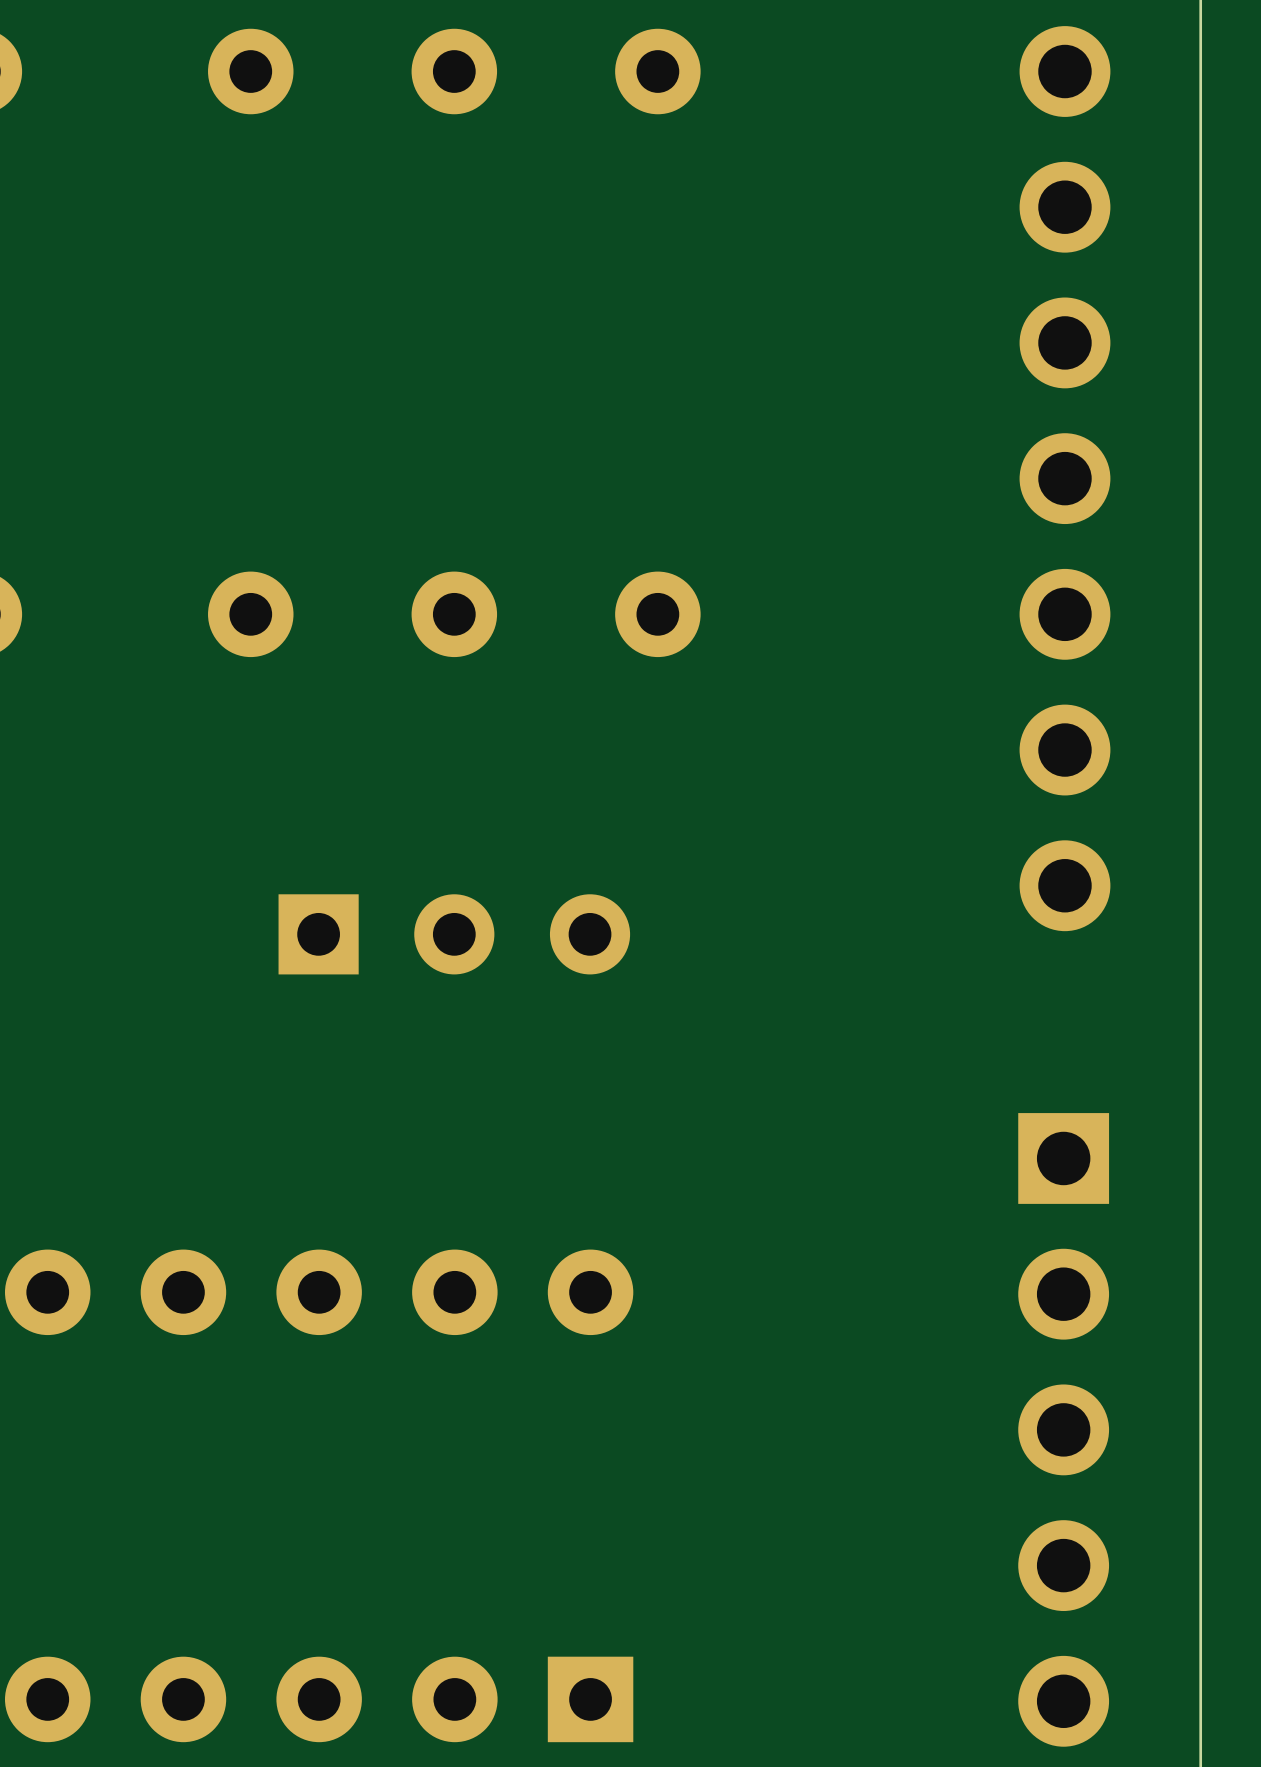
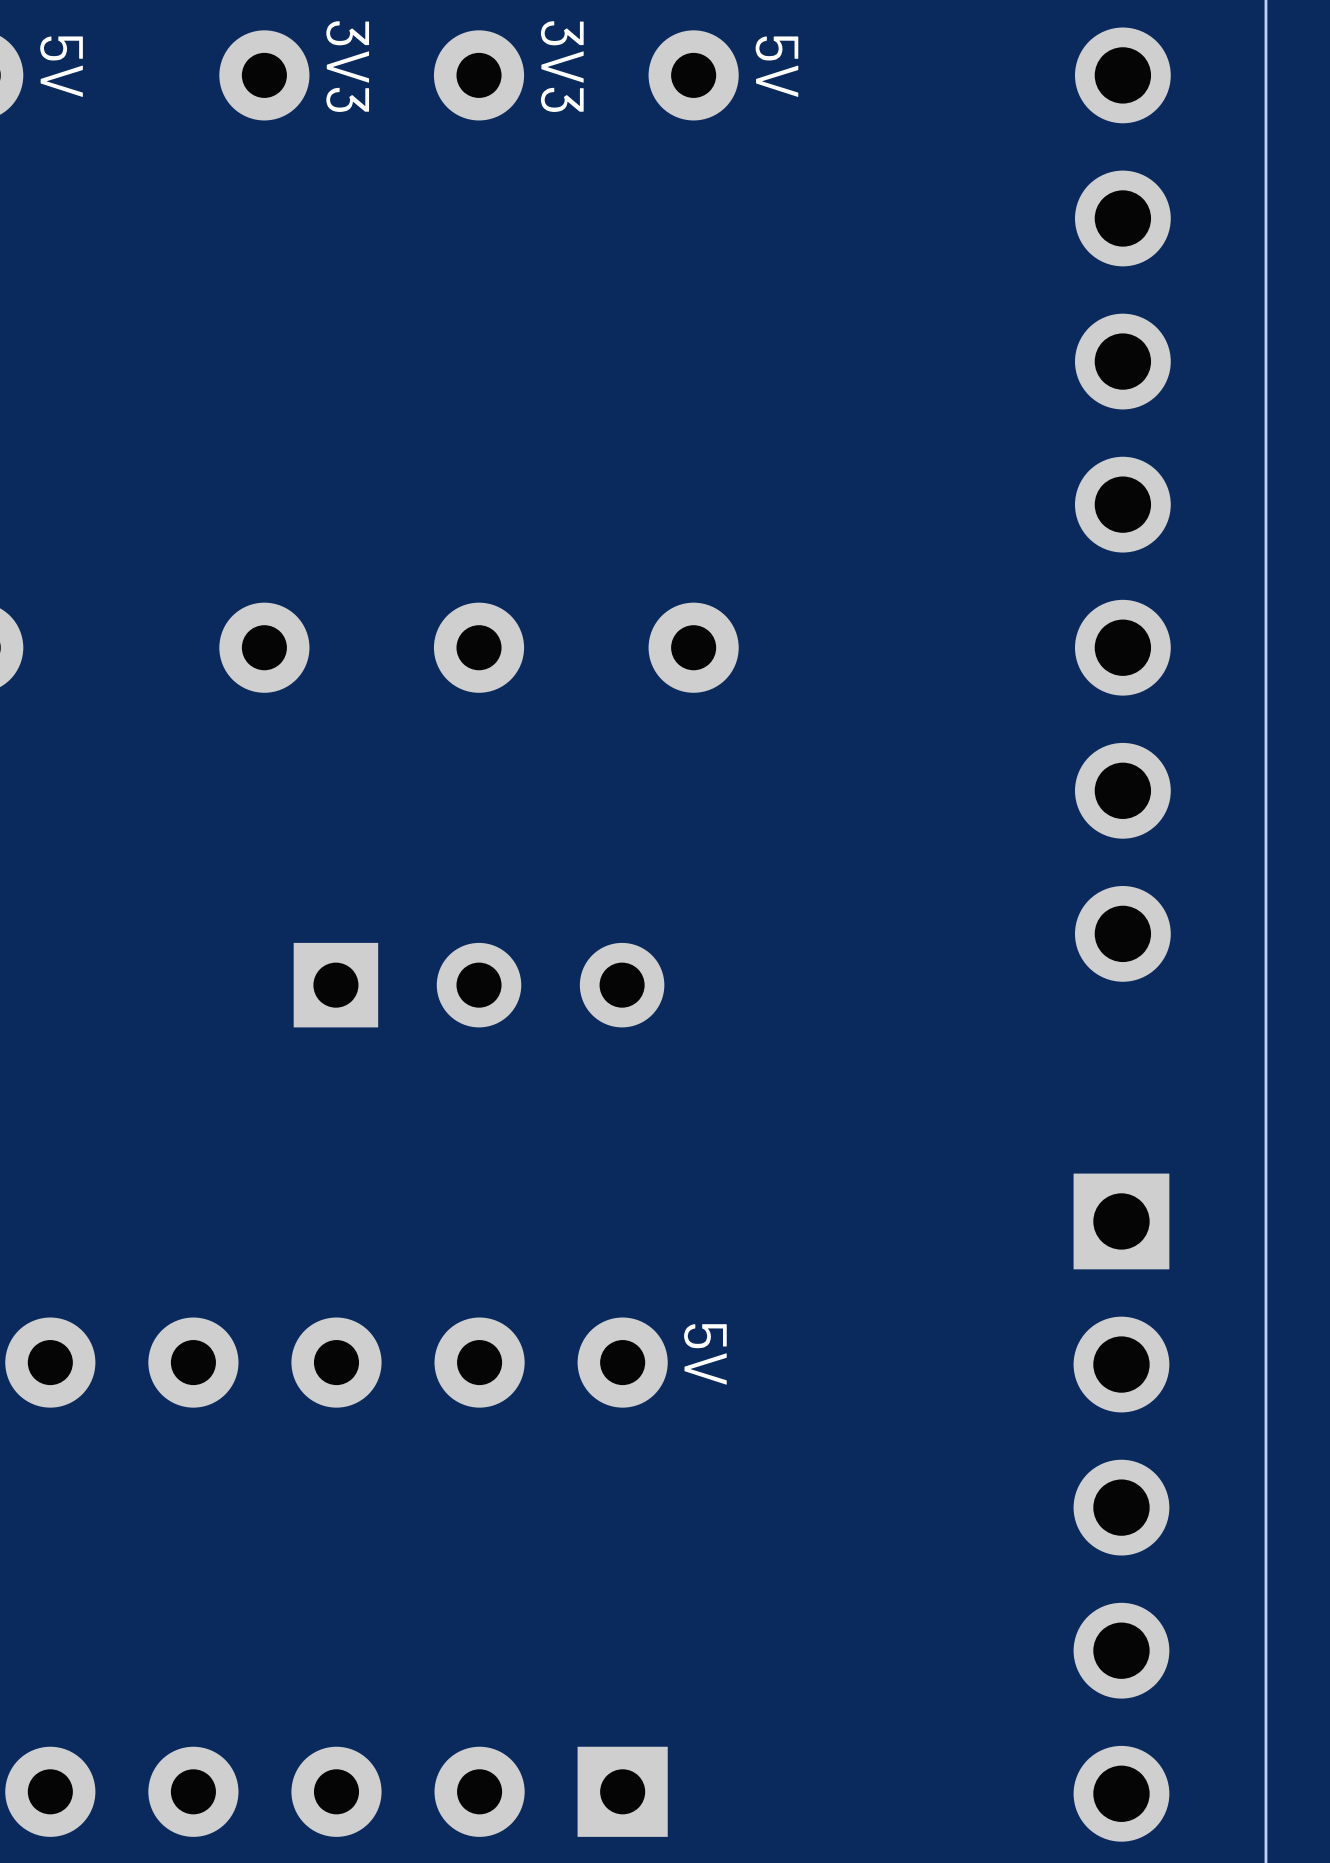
text: none -> 5V (61, 66)
text: none -> 3V3 (347, 66)
text: none -> 3V3 (562, 66)
text: none -> 5V (776, 66)
text: none -> 5V (705, 1354)

